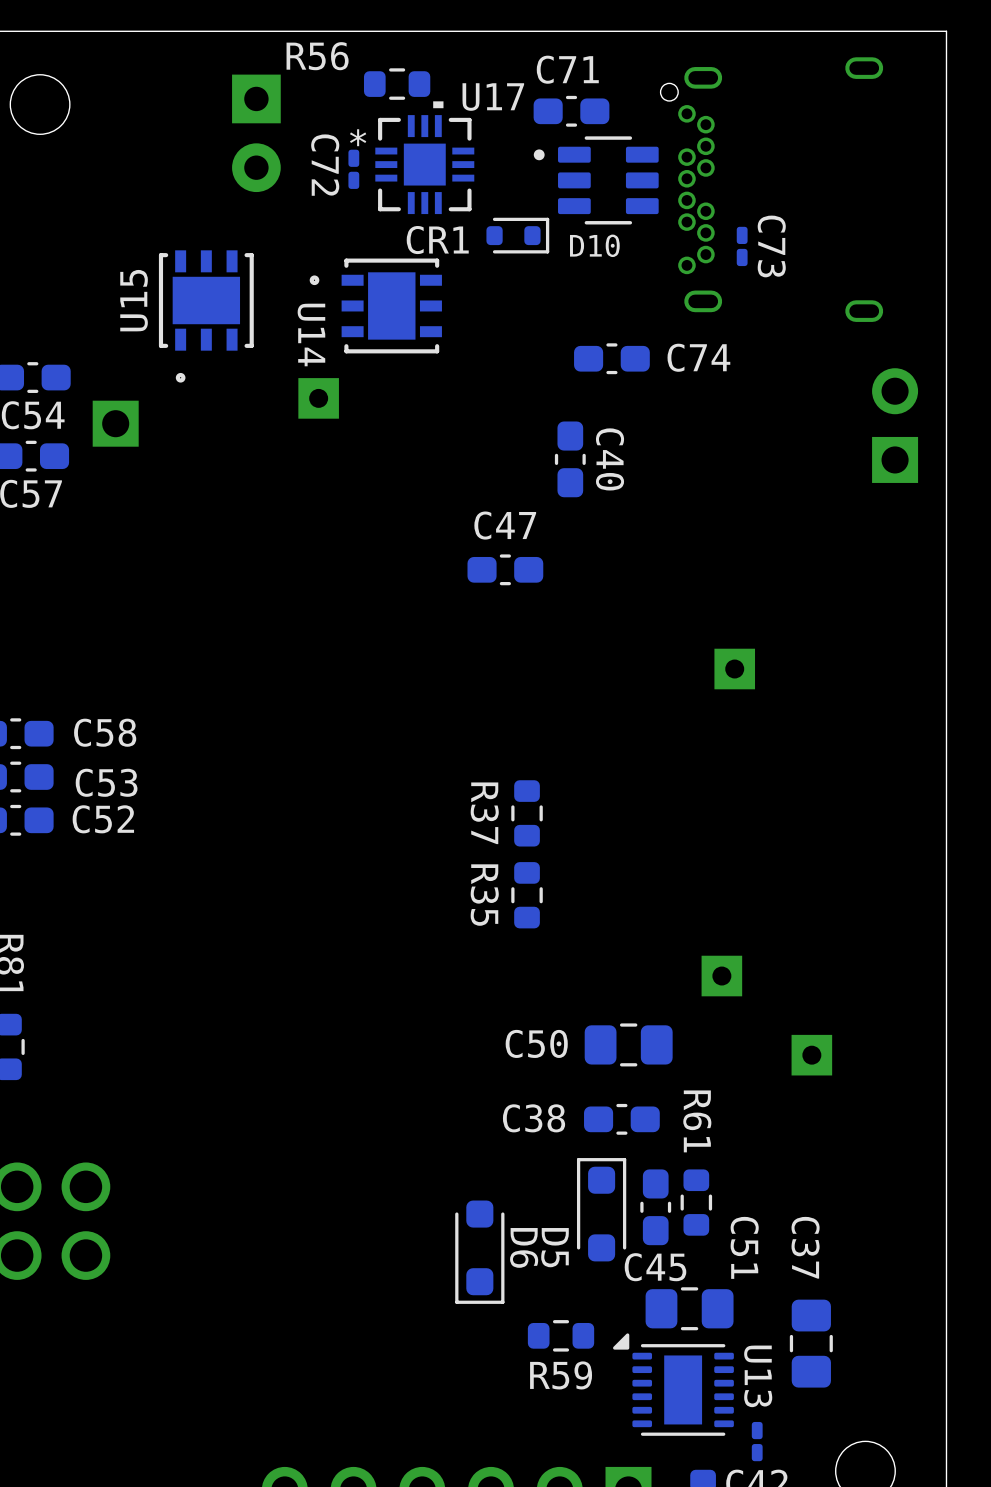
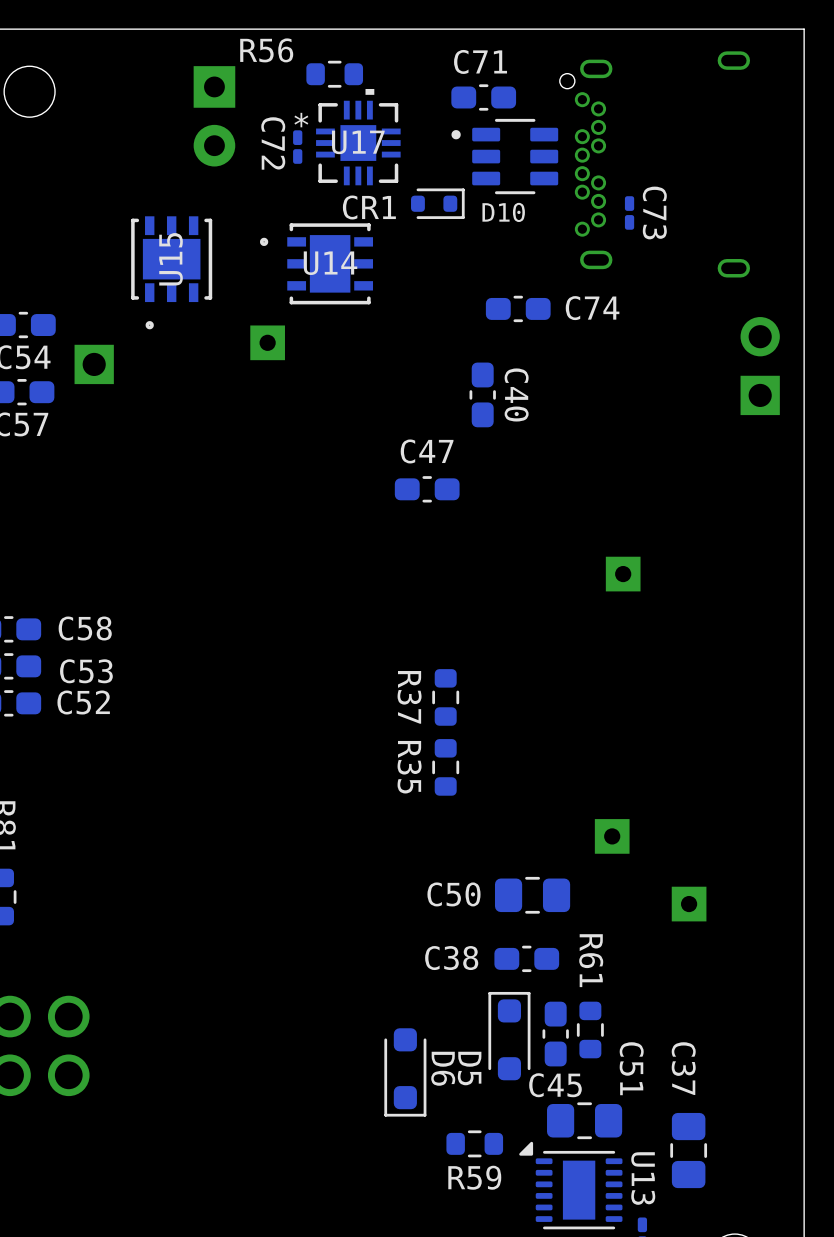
U17 name position: U17 (493, 97) -> U17 (358, 142)
U15 name position: U15 (134, 300) -> U15 (171, 259)
U14 name rotation: 0° (311, 334) -> 90° counterclockwise (330, 263)

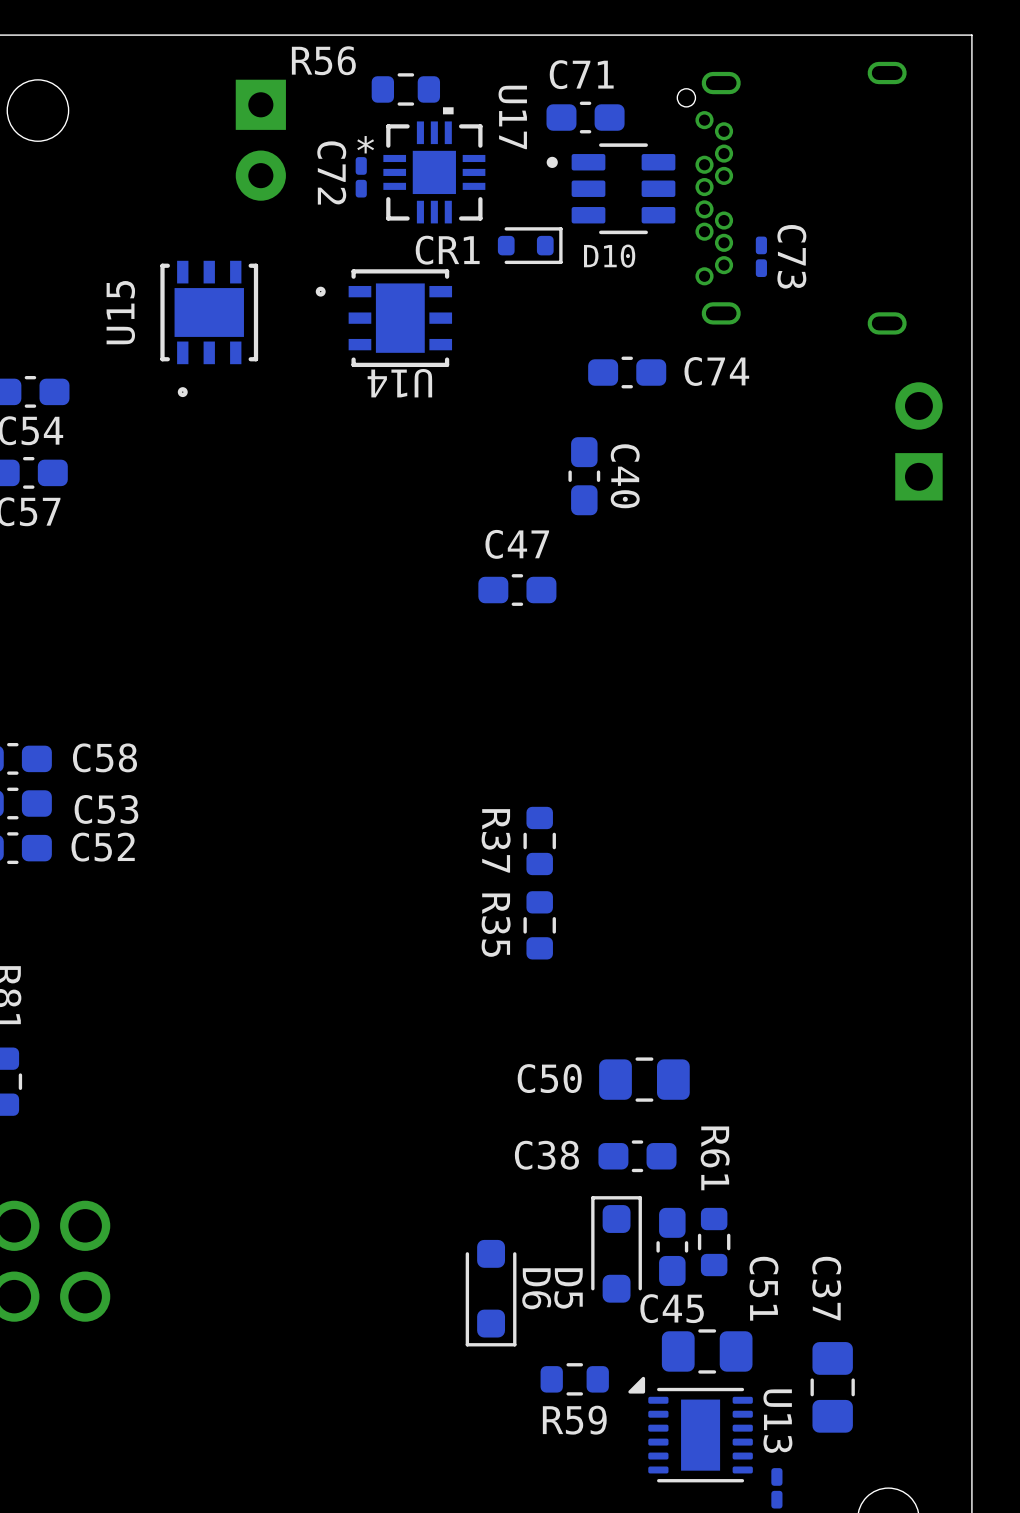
U17 name rotation: 0° (358, 142) -> 90° clockwise (512, 117)
U15 name position: U15 (171, 259) -> U15 (120, 312)
U14 name rotation: 0° (330, 263) -> 180° (399, 383)
part: (267, 342) -> none
part: (94, 364) -> none
part: (623, 574) -> none
part: (612, 836) -> none
part: (689, 904) -> none

